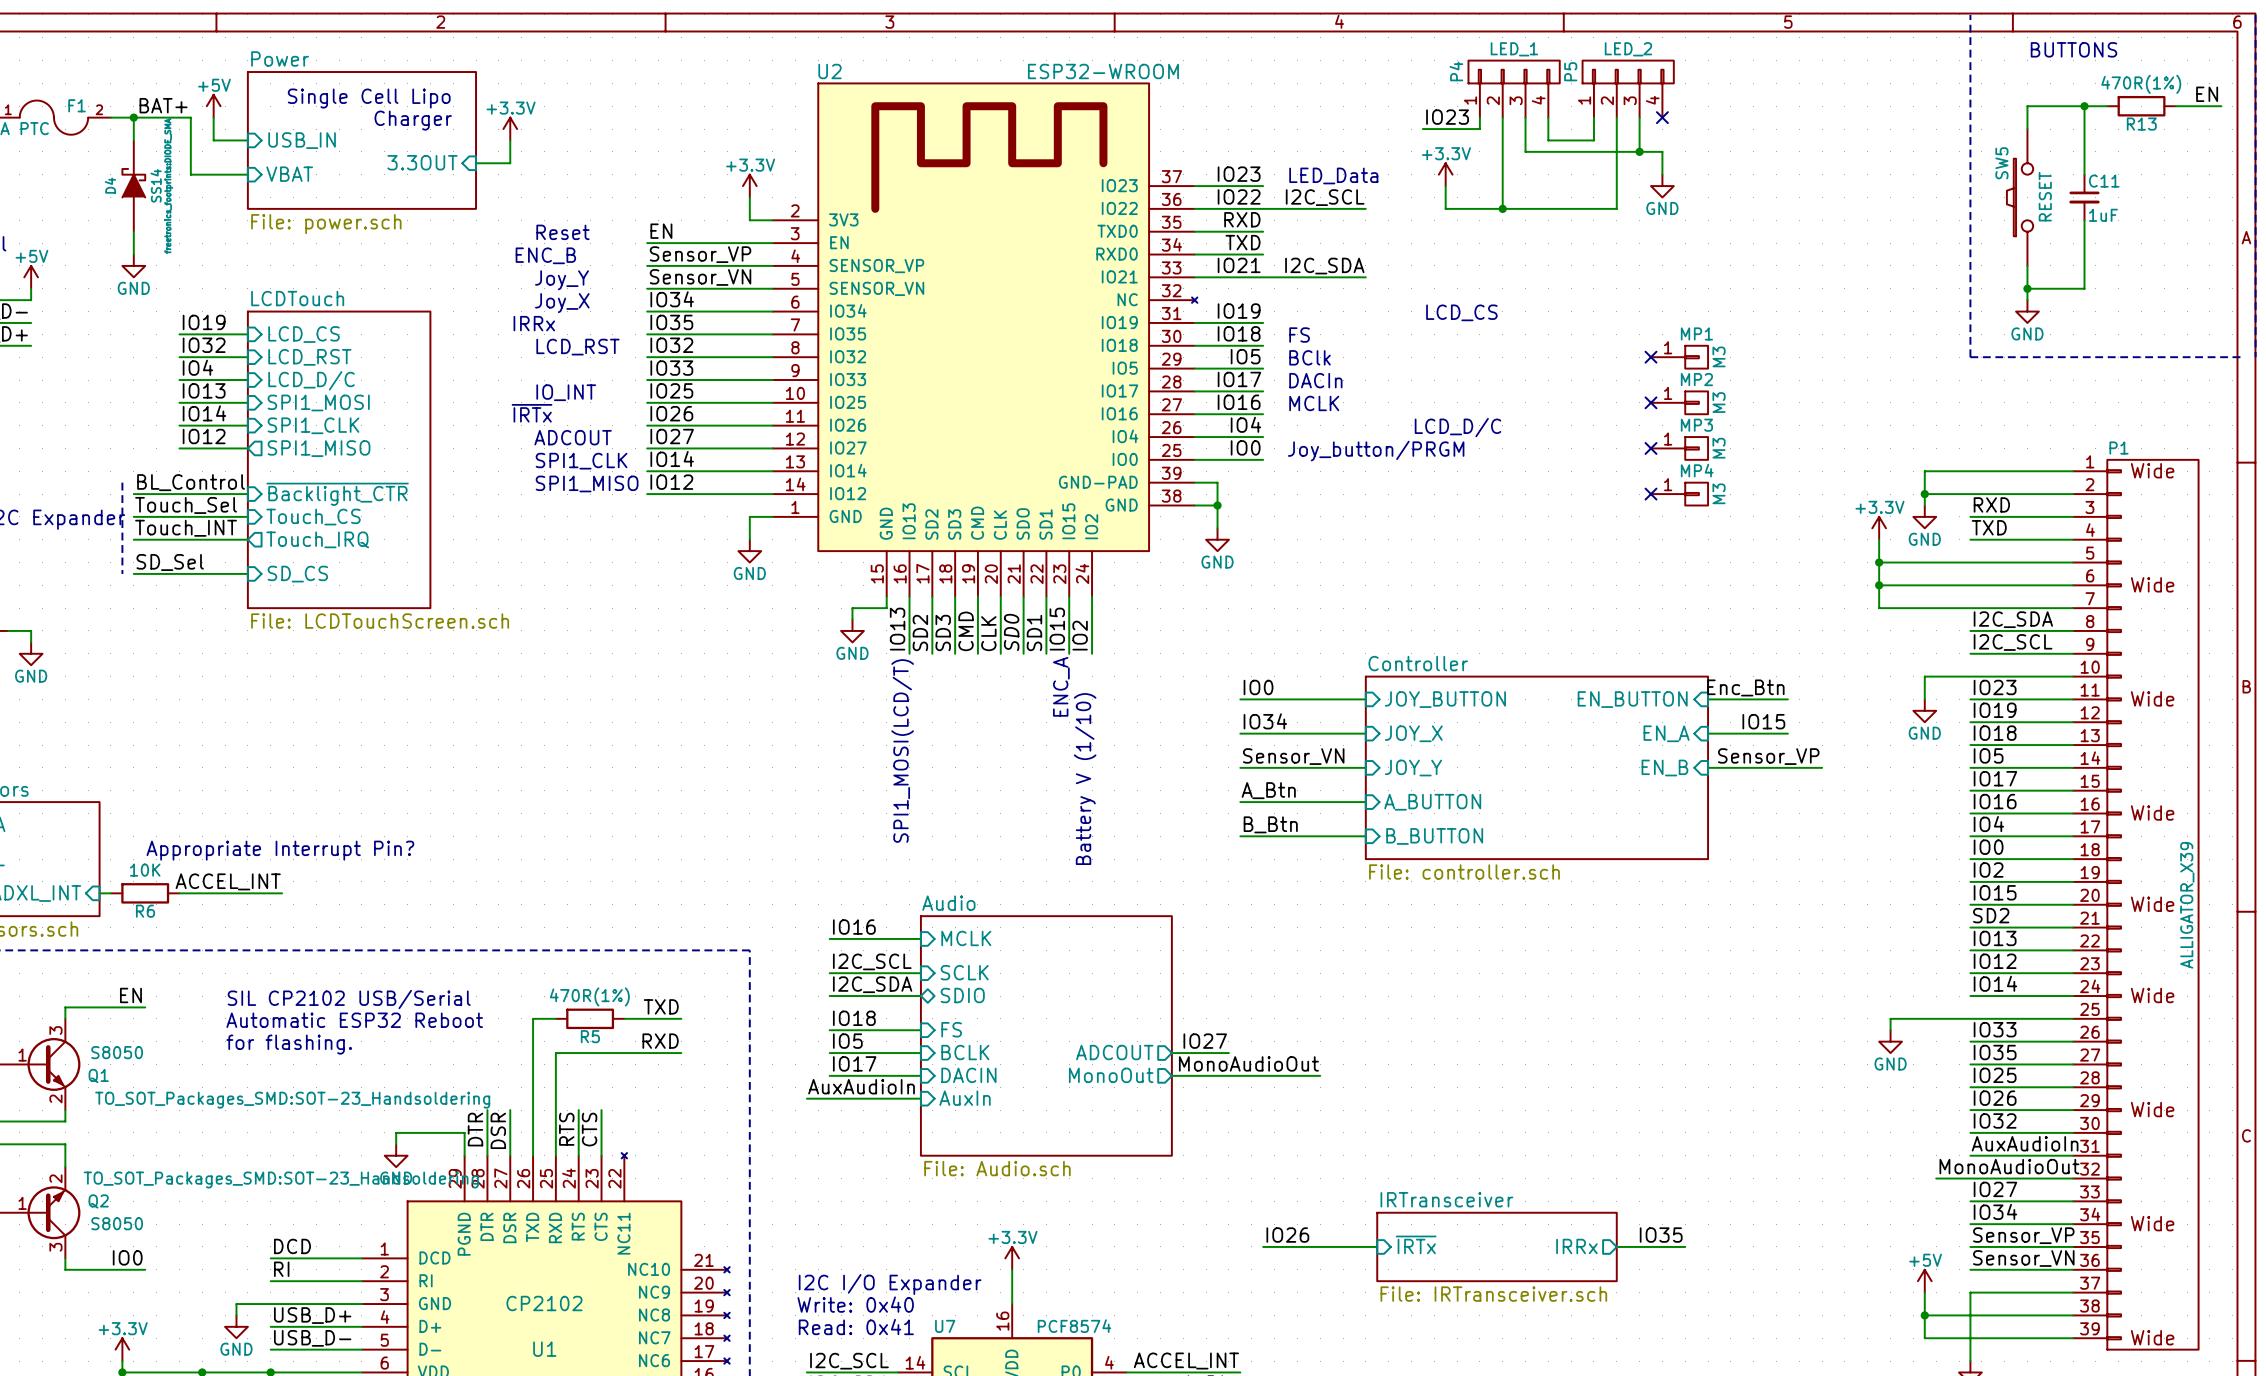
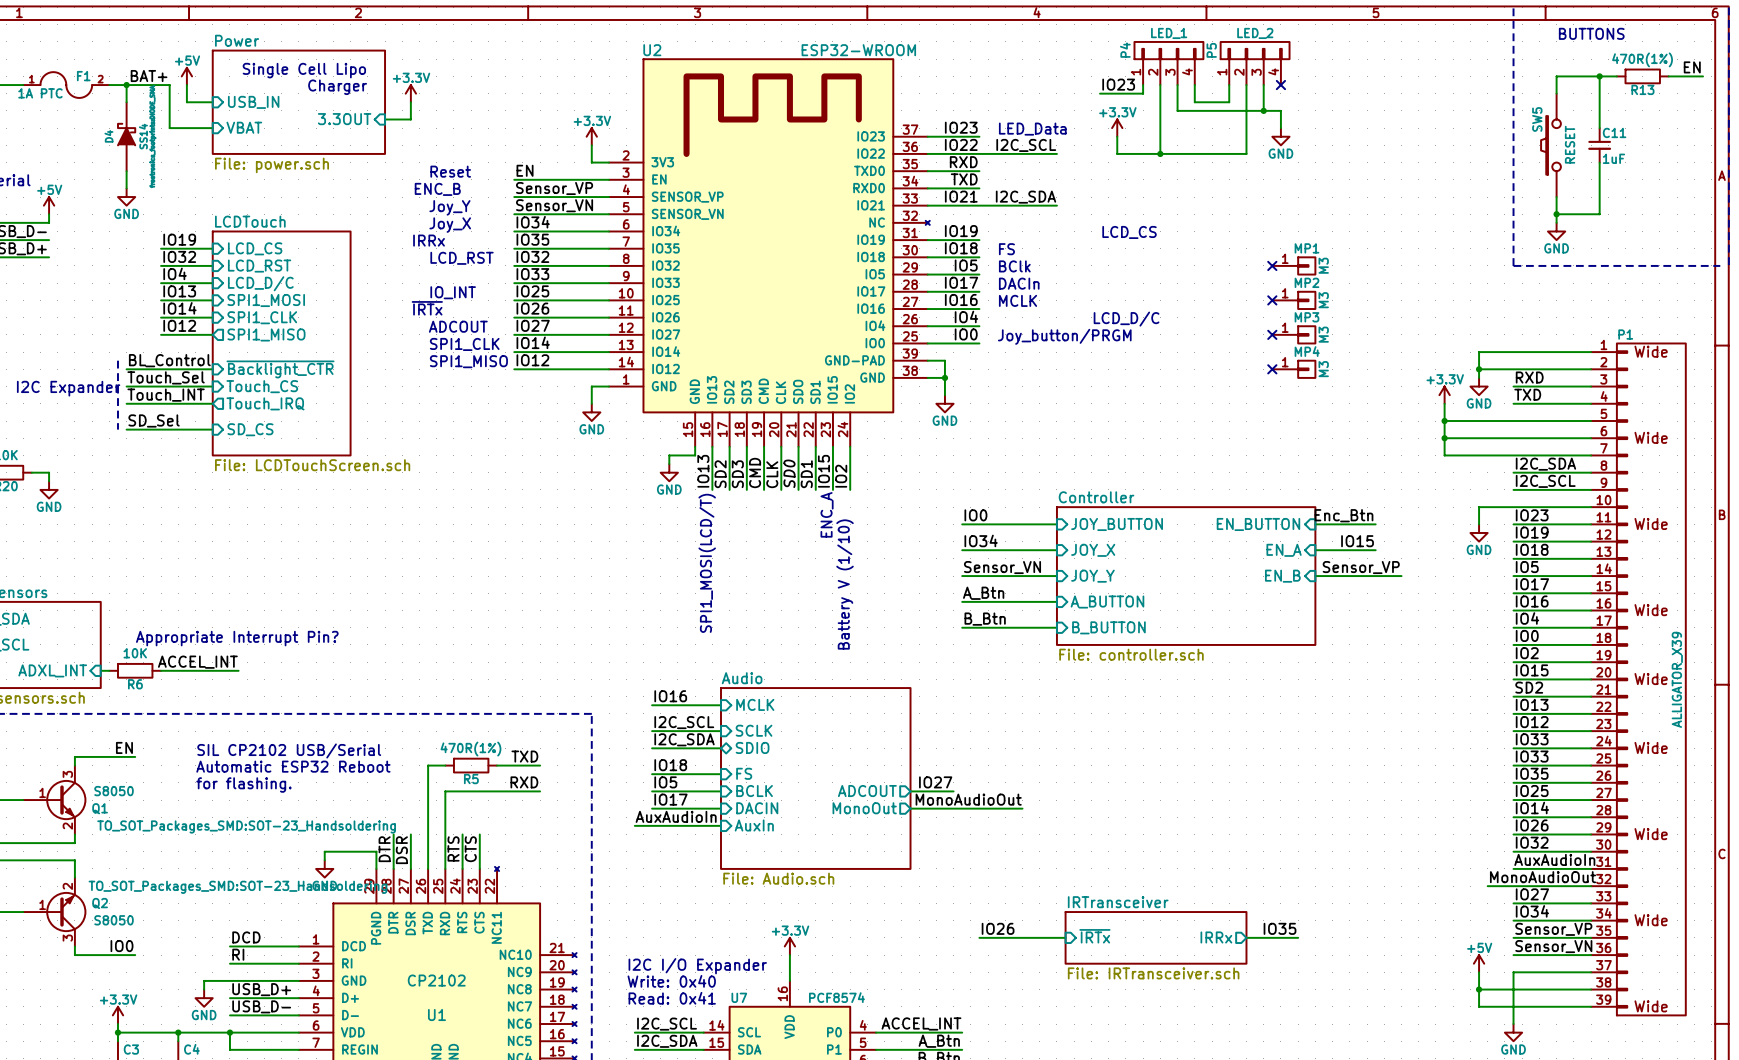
label: IO14 (1995, 983) -> IO33 (1532, 739)
label: none -> IO33 (1532, 756)
wire: (1970, 1018) (1890, 1018) (1890, 1030) -> none
label: IO33 (1995, 1029) -> IO35 (1532, 773)
power symbol: GND (1890, 1041) -> none
label: IO35 (1995, 1052) -> IO25 (1532, 791)
label: IO25 (1995, 1075) -> IO14 (1532, 807)

